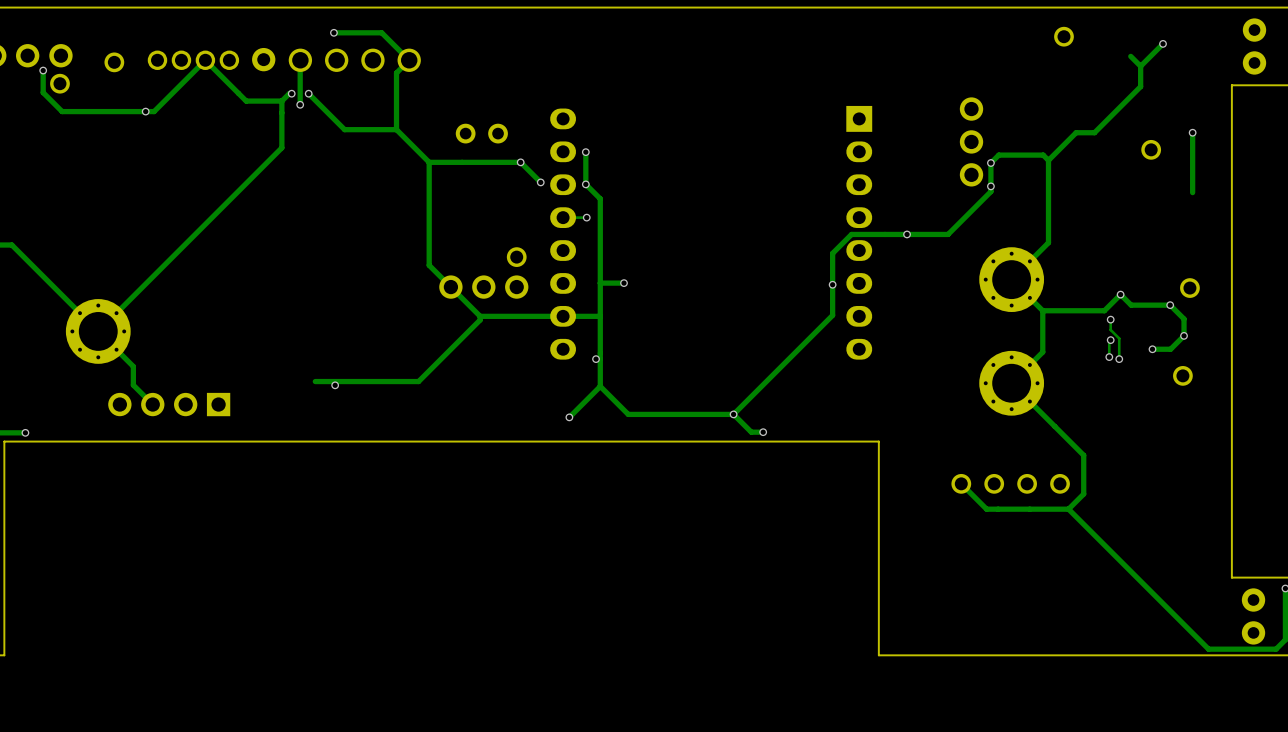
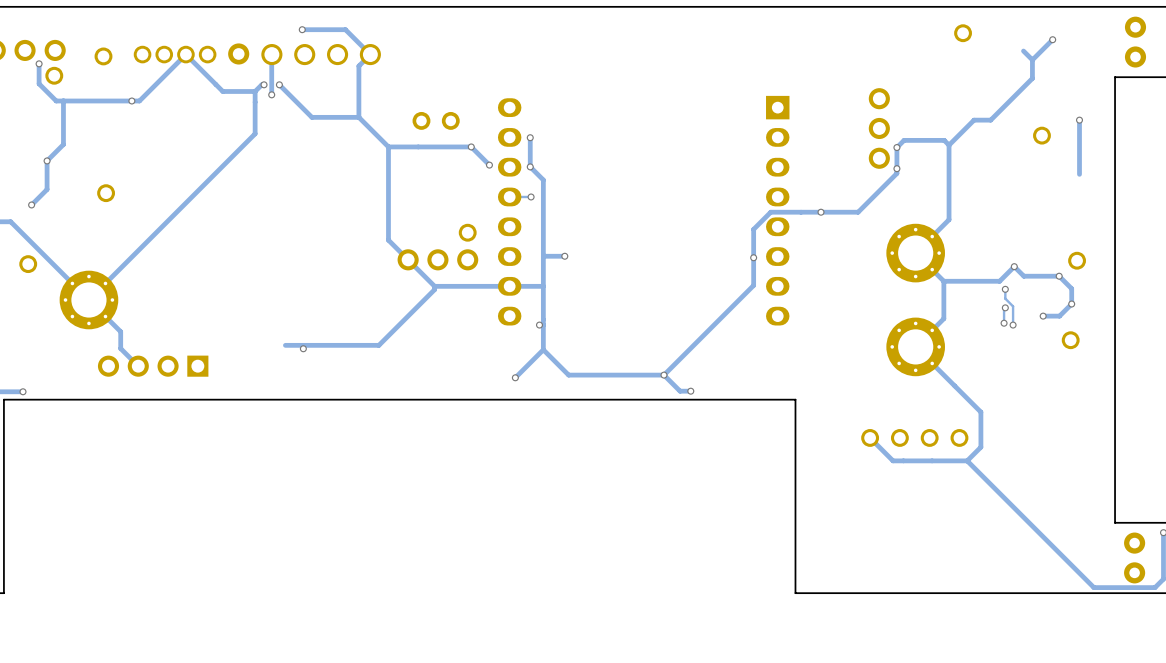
track: none -> (63, 100) (63, 144) (47, 160) (47, 189) (31, 204)
via: none -> (47, 160)
part: none -> (106, 193)
via: none -> (31, 204)
part: none -> (28, 264)

